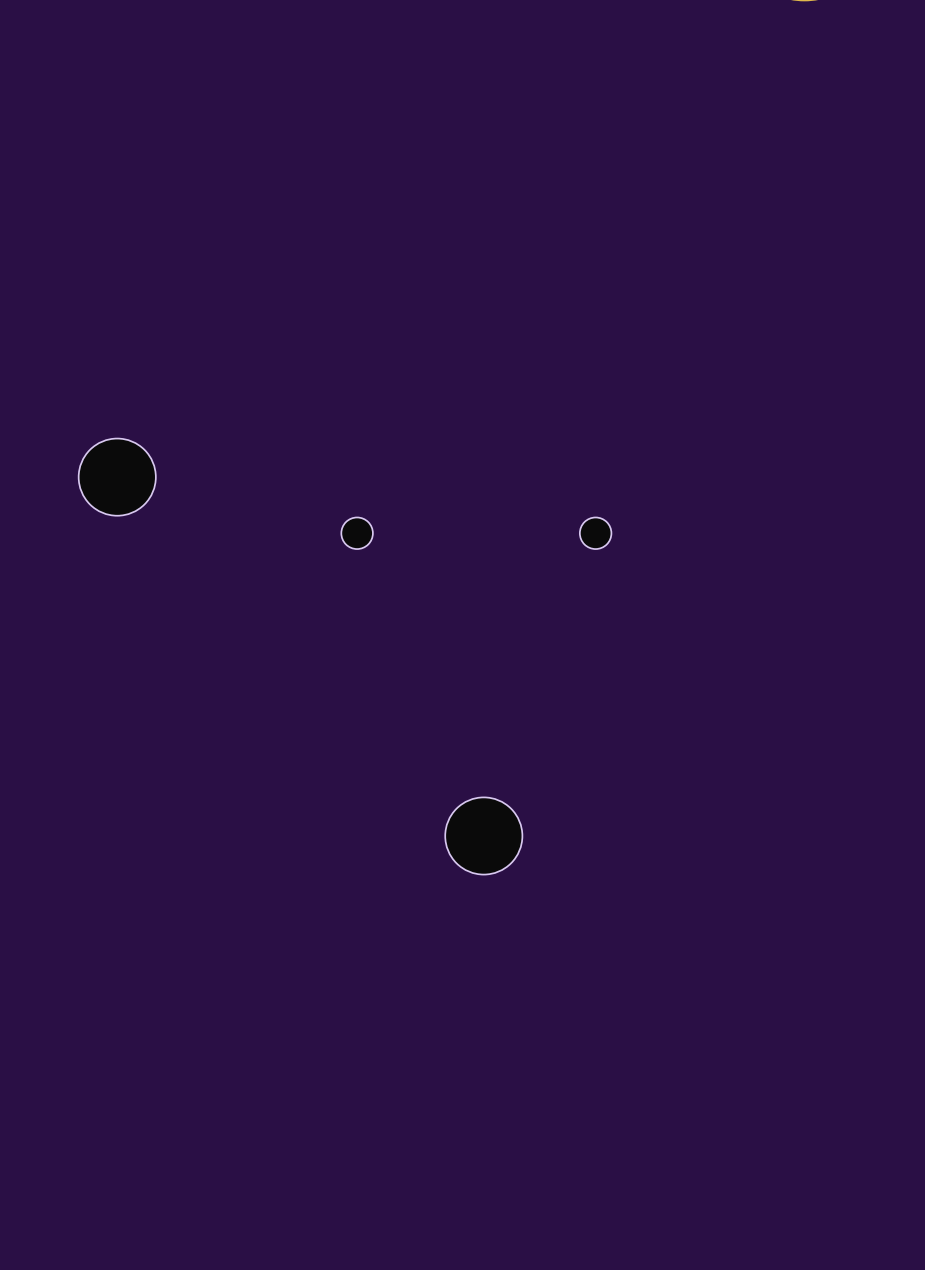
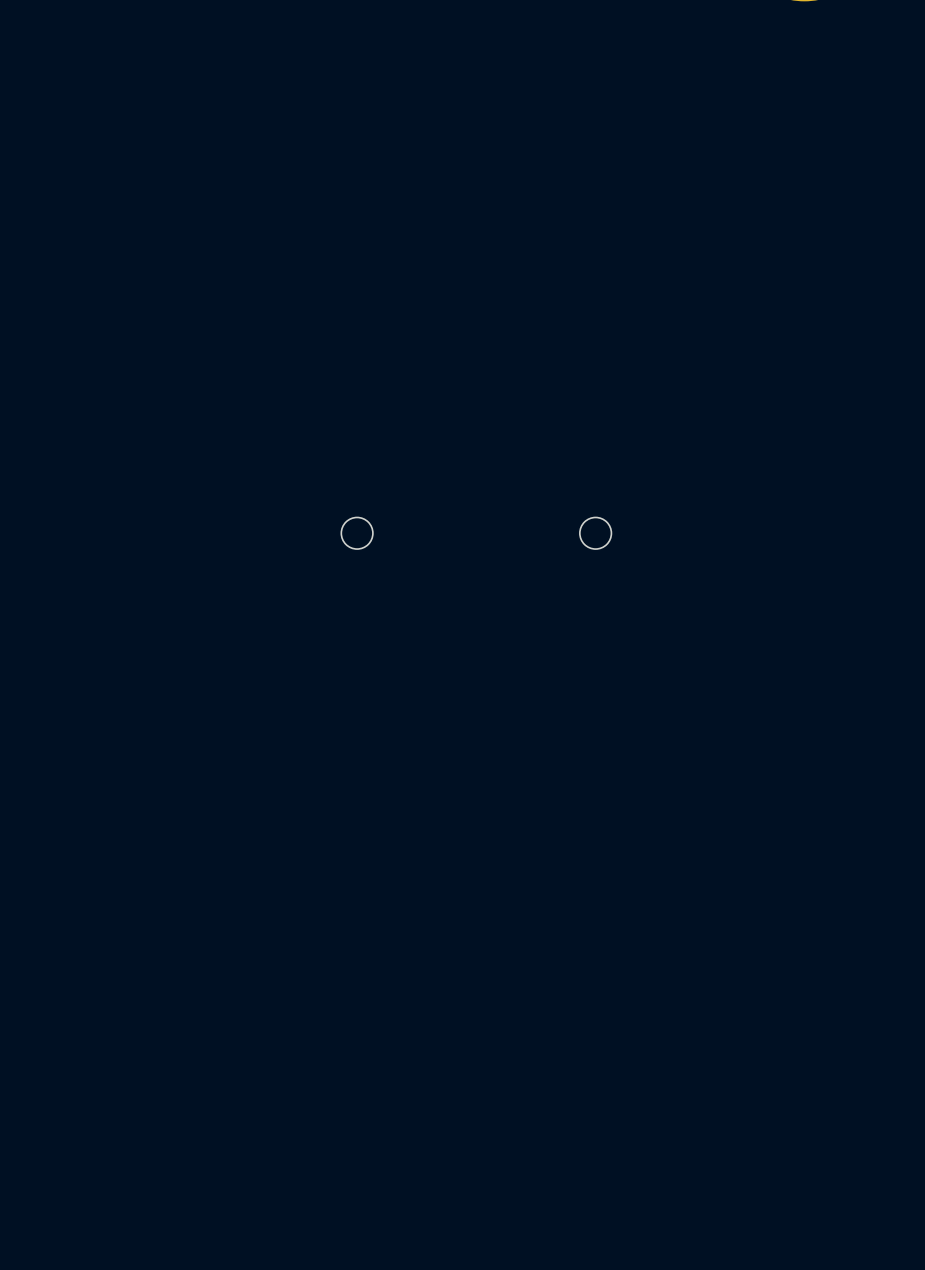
part: (117, 477) -> none
part: (483, 835) -> none

